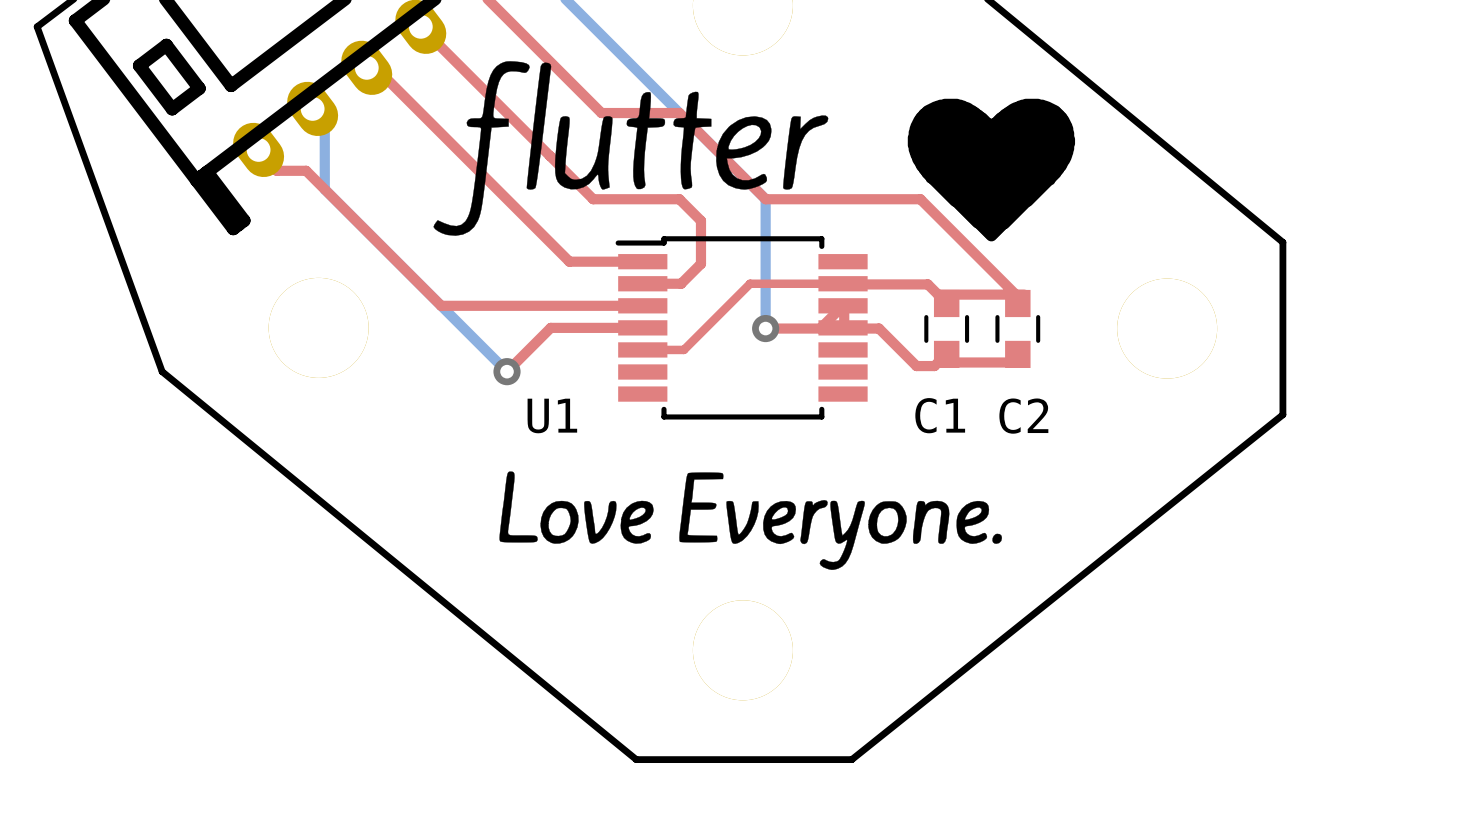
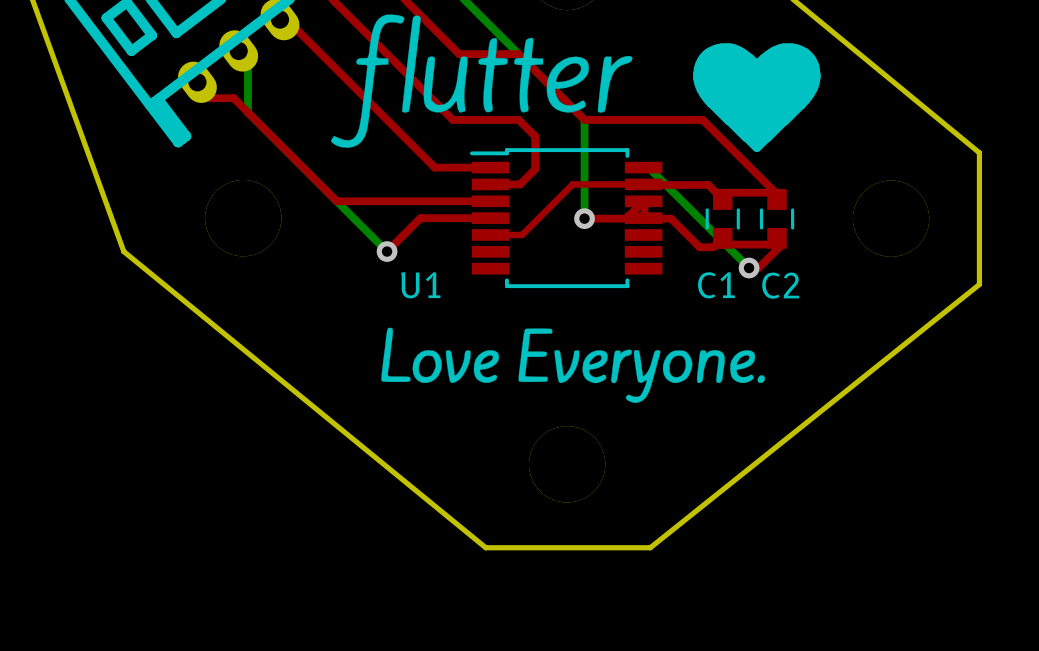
bottom track: none -> (650, 169) (749, 268)
top track: none -> (781, 244) (758, 268) (749, 268)
via: none -> (749, 268)

